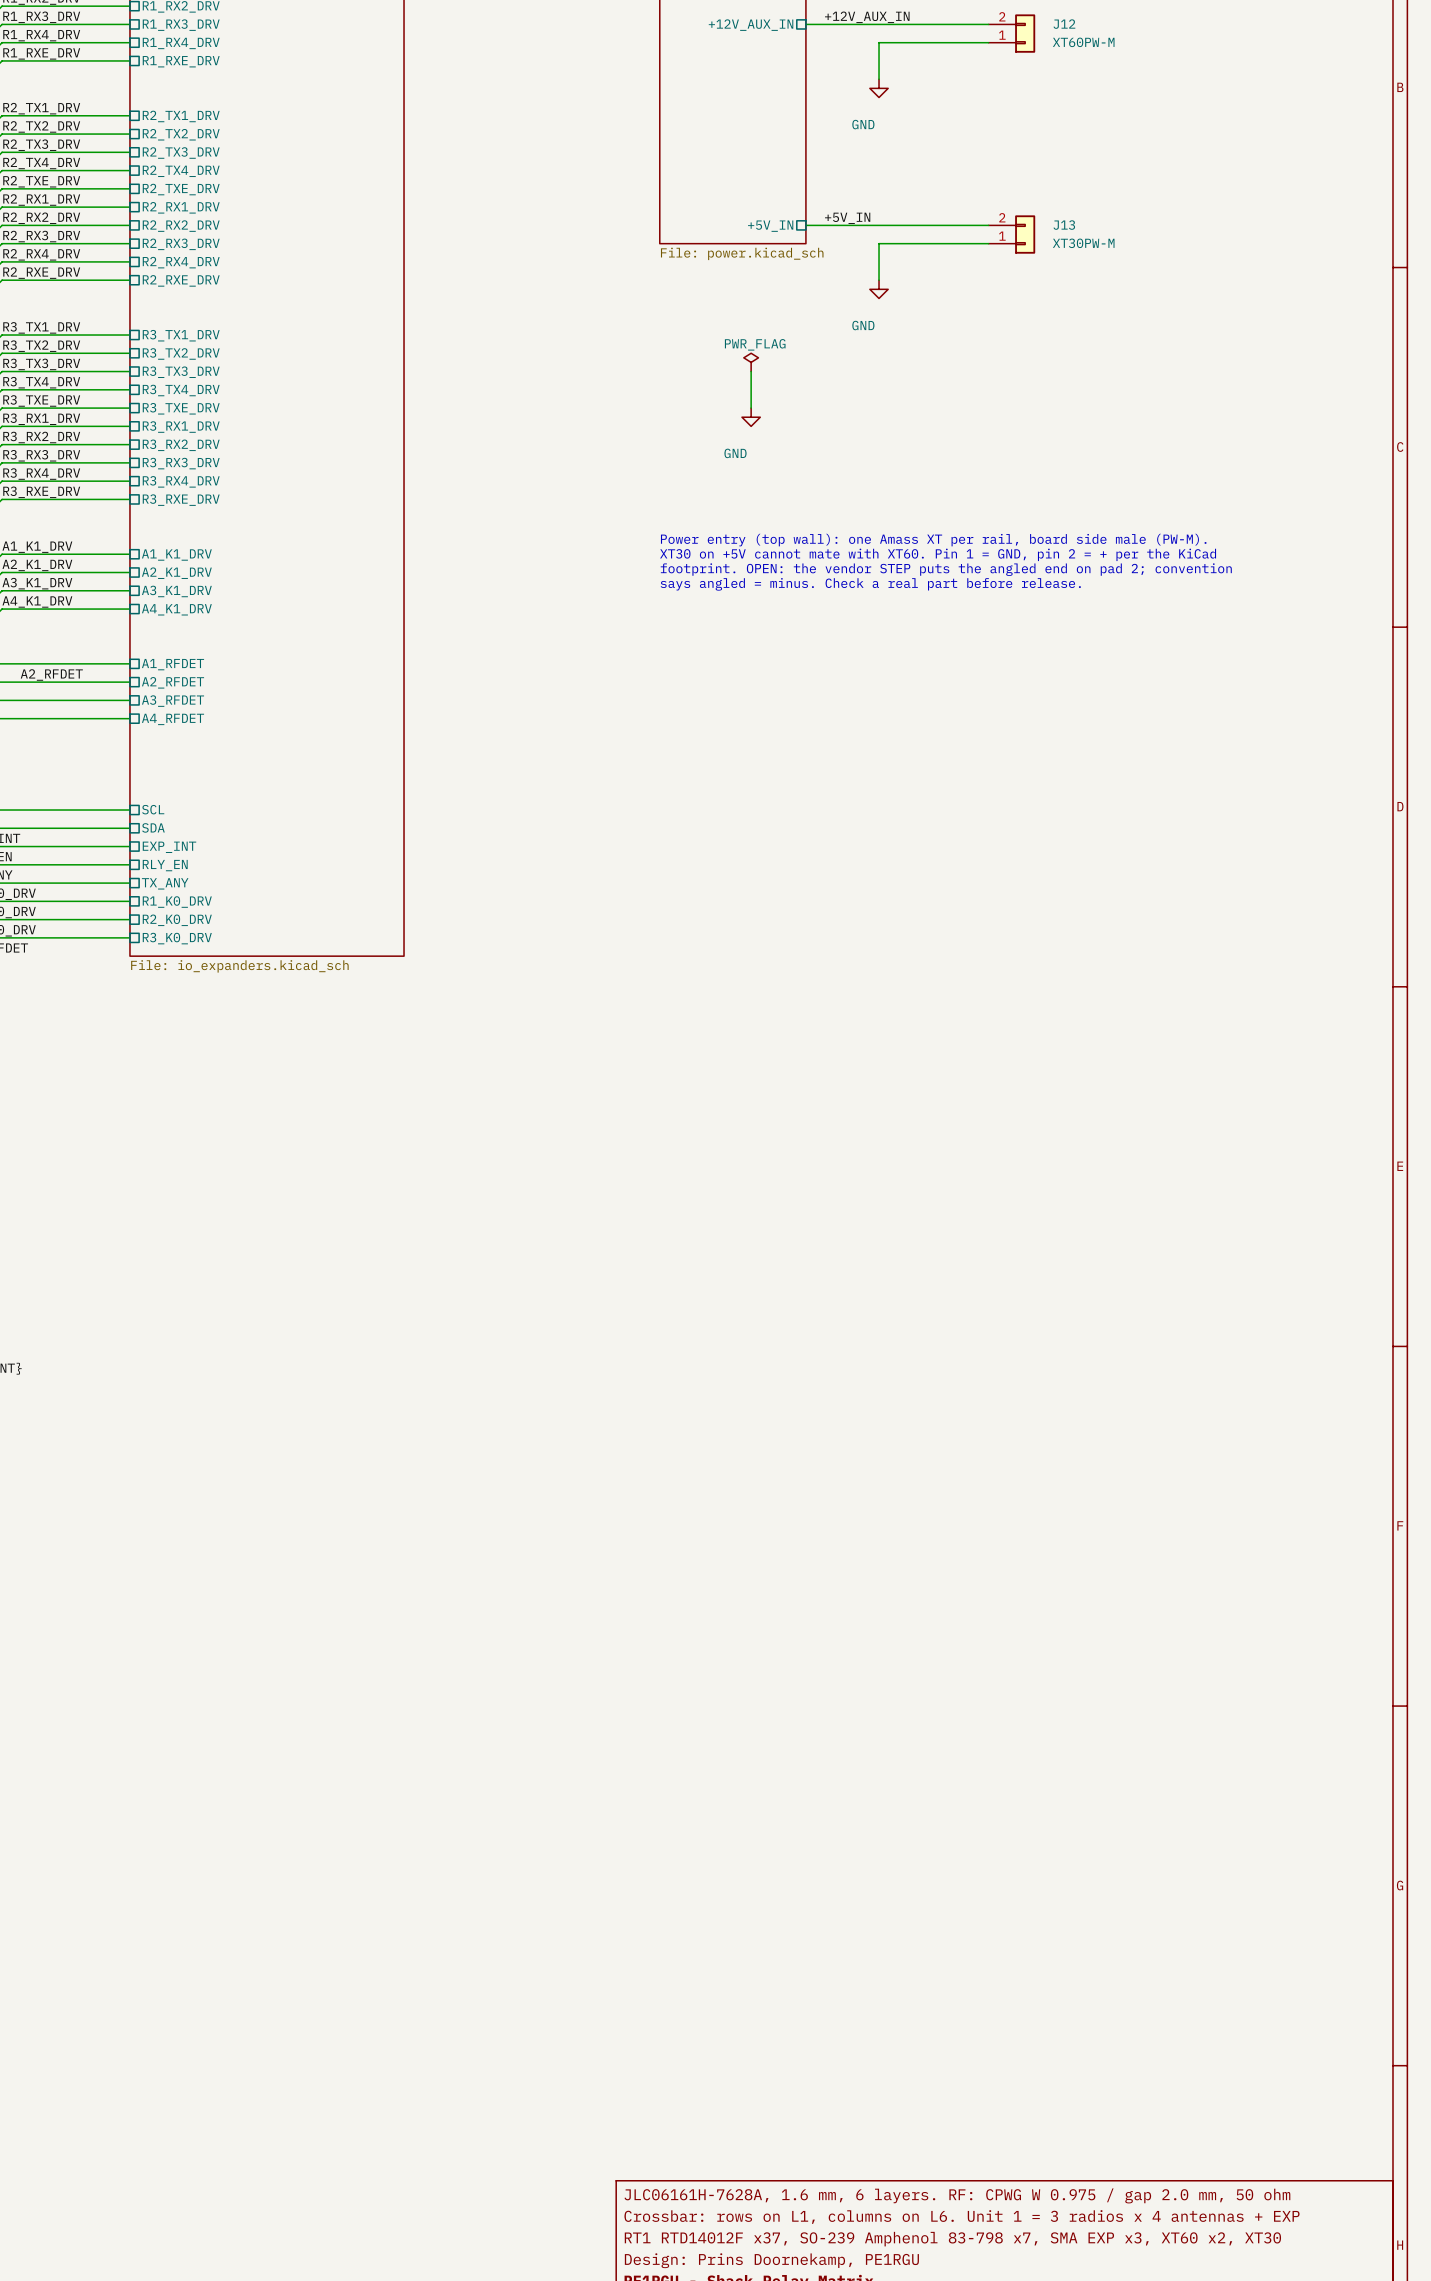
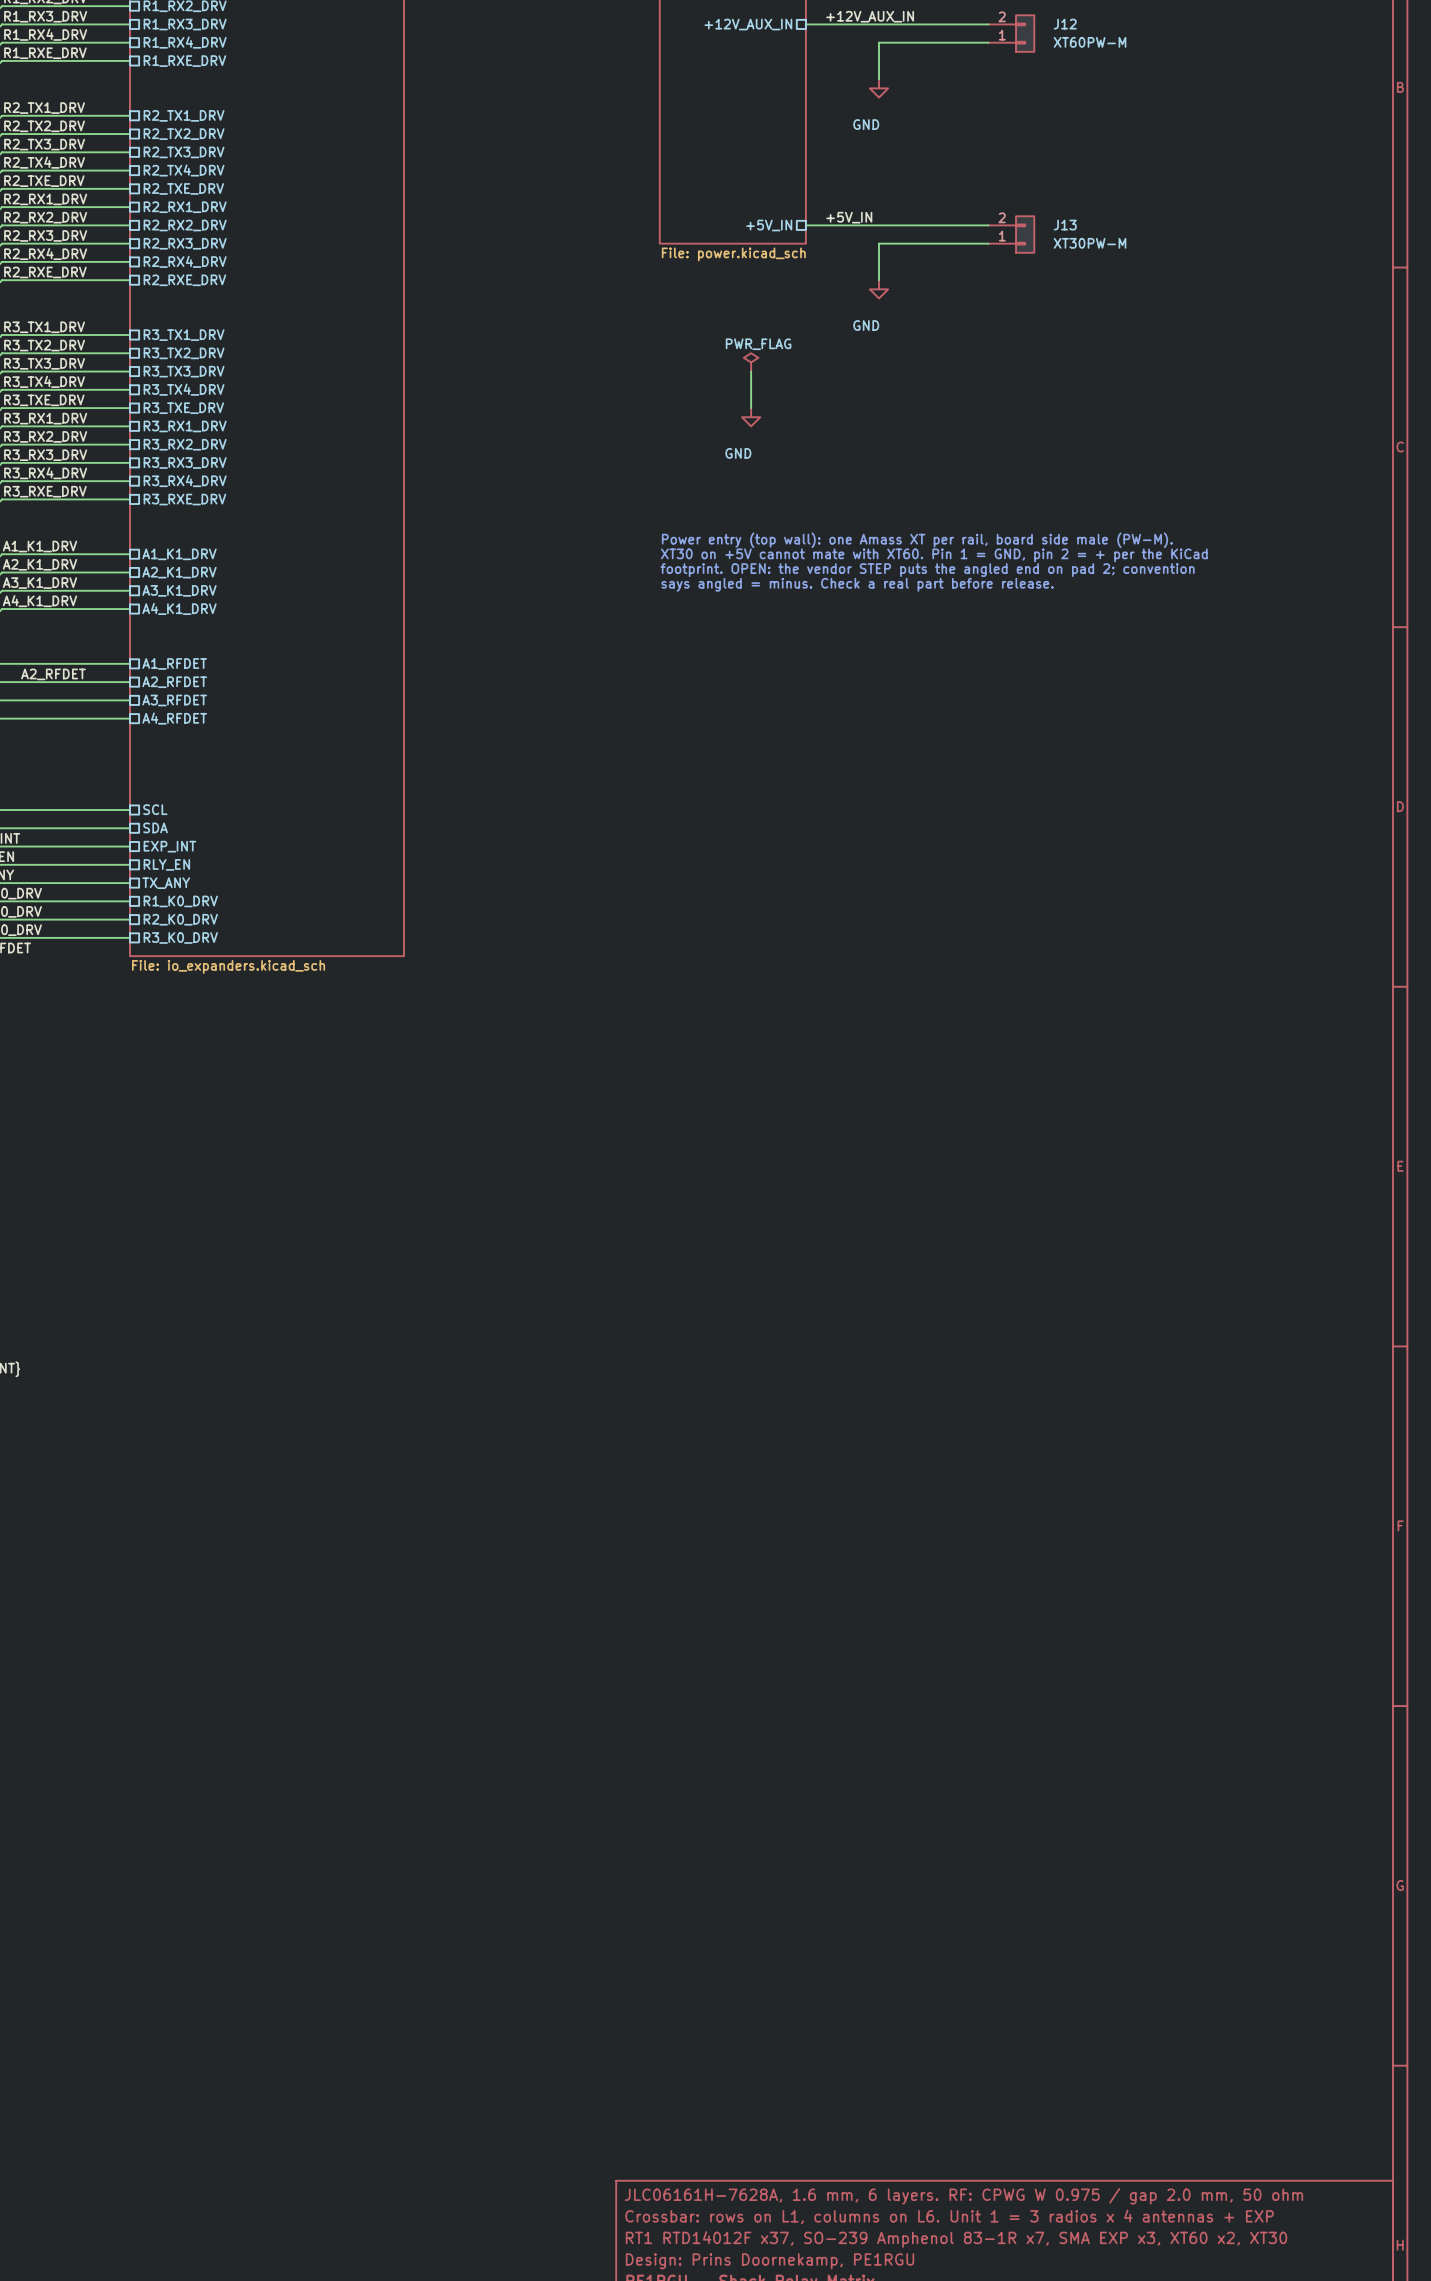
title block: RT1 RTD14012F x37, SO-239 Amphenol 83-798 x7, SMA EXP x3, XT60 x2, XT30 (952, 2239) -> RT1 RTD14012F x37, SO-239 Amphenol 83-1R x7, SMA EXP x3, XT60 x2, XT30 (956, 2239)

